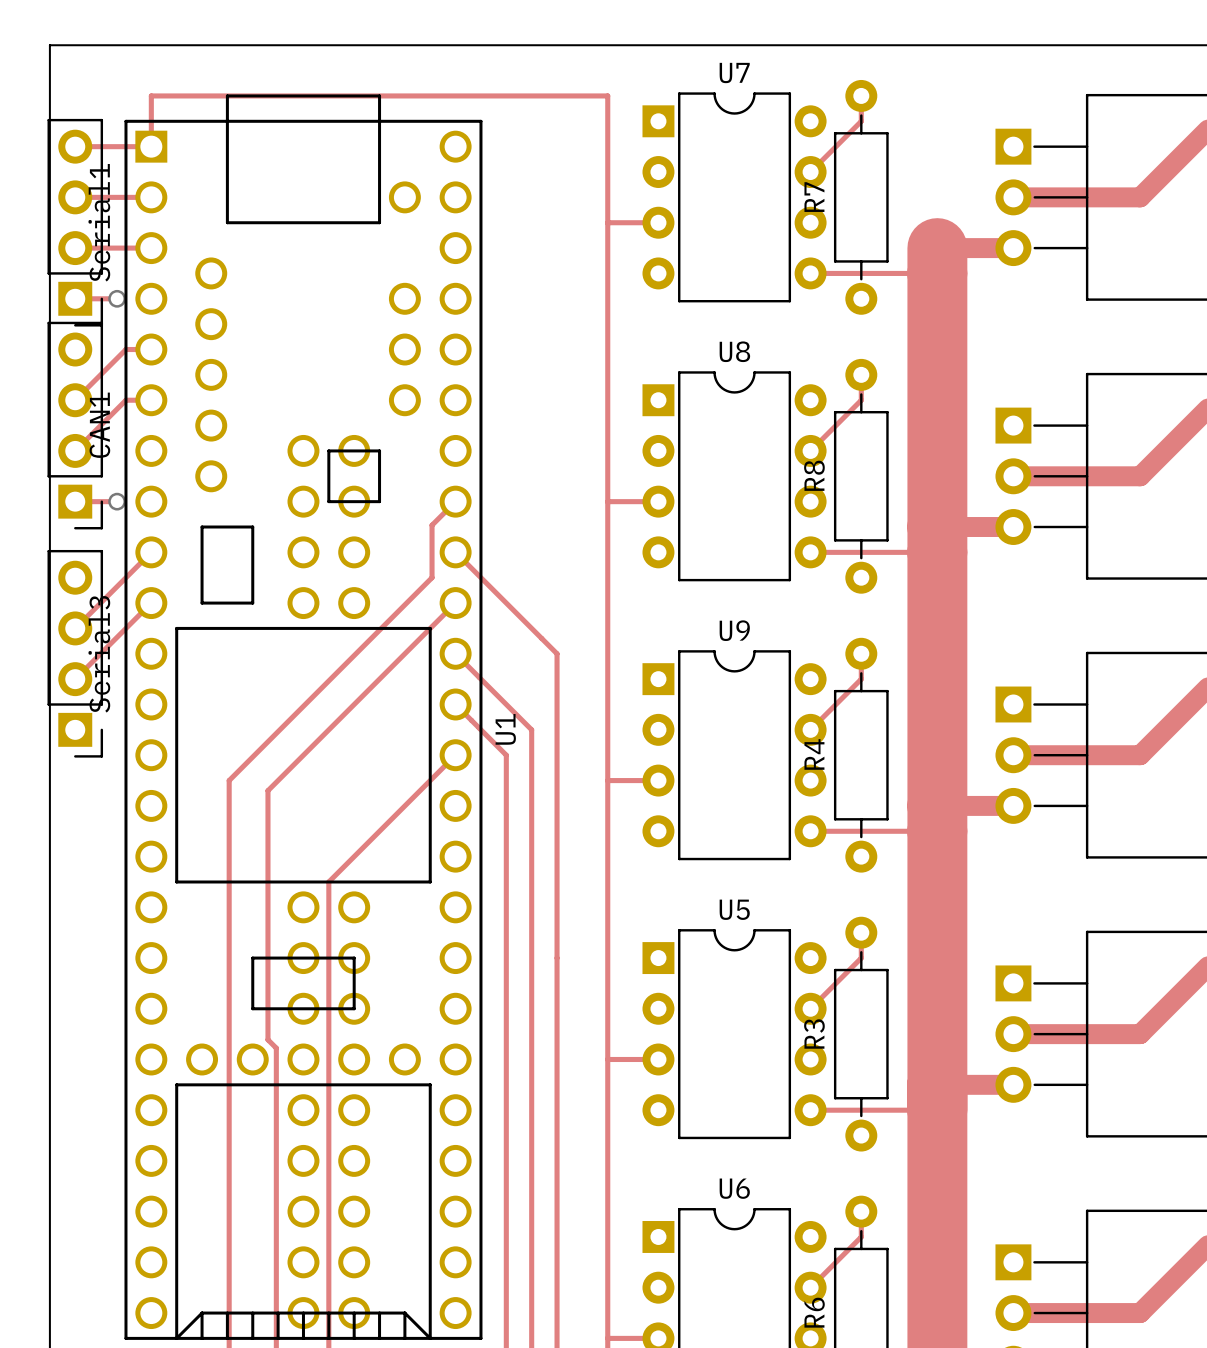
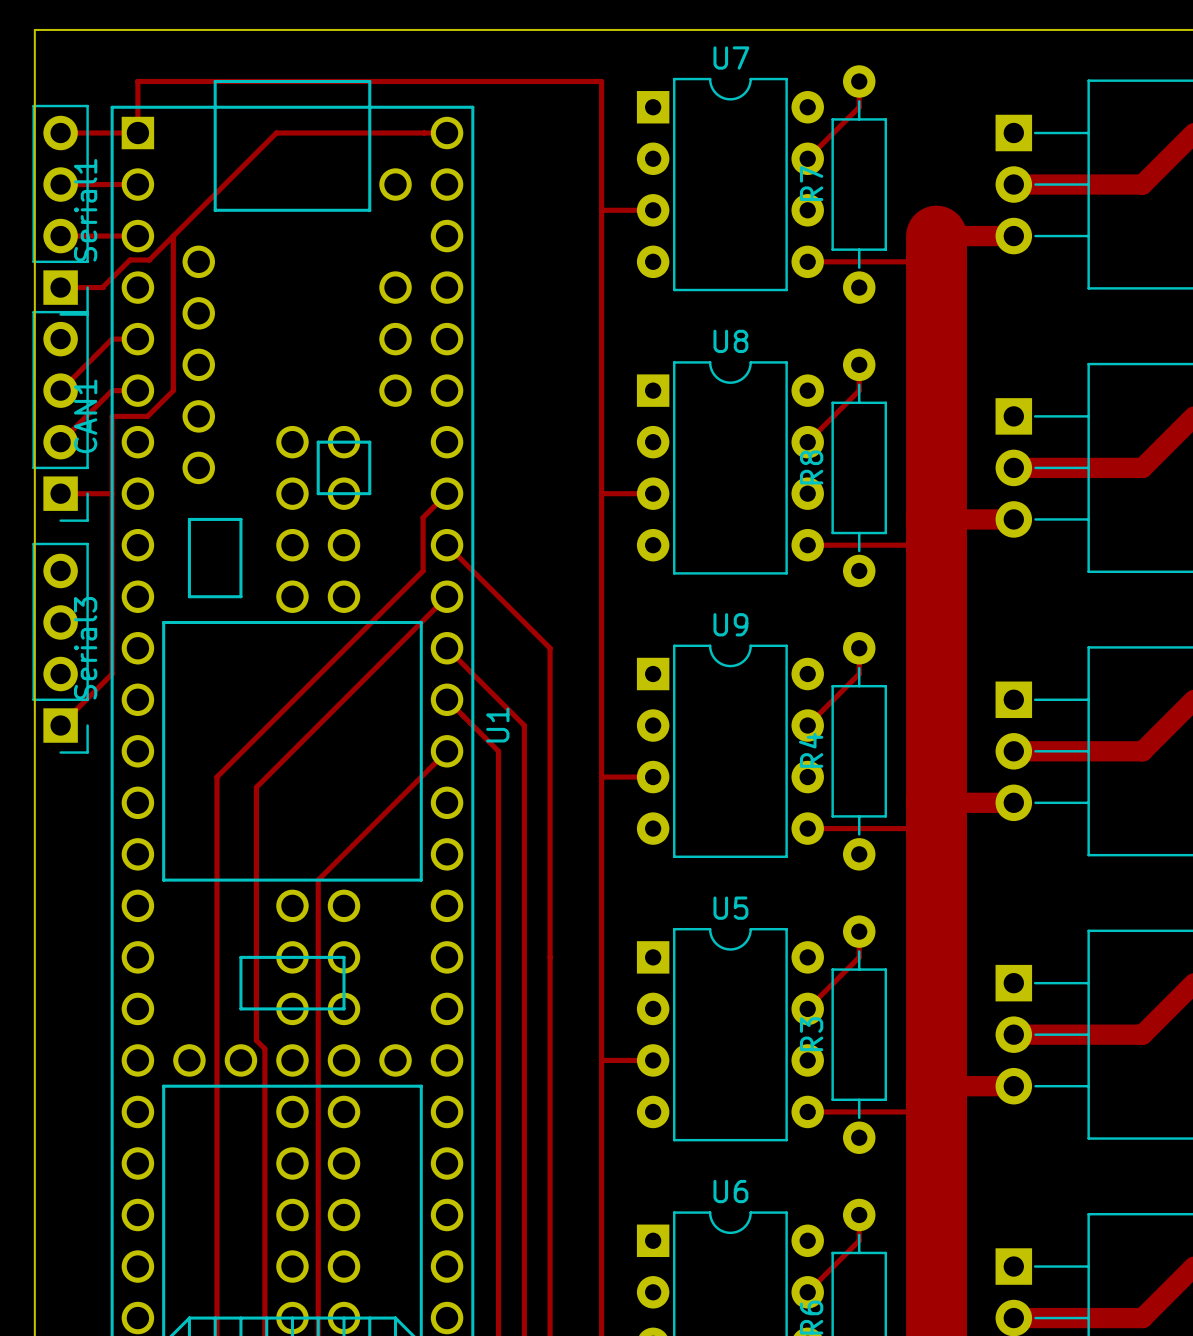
track: none -> (447, 133) (276, 133) (149, 260) (130, 260) (103, 287)
track: none -> (173, 236) (173, 390) (147, 416) (112, 416) (112, 674) (60, 725)
via: (117, 298) -> none
track: none -> (103, 493) (112, 493)
via: (117, 501) -> none
track: (151, 552) (75, 628) -> none
track: (151, 603) (75, 679) -> none

